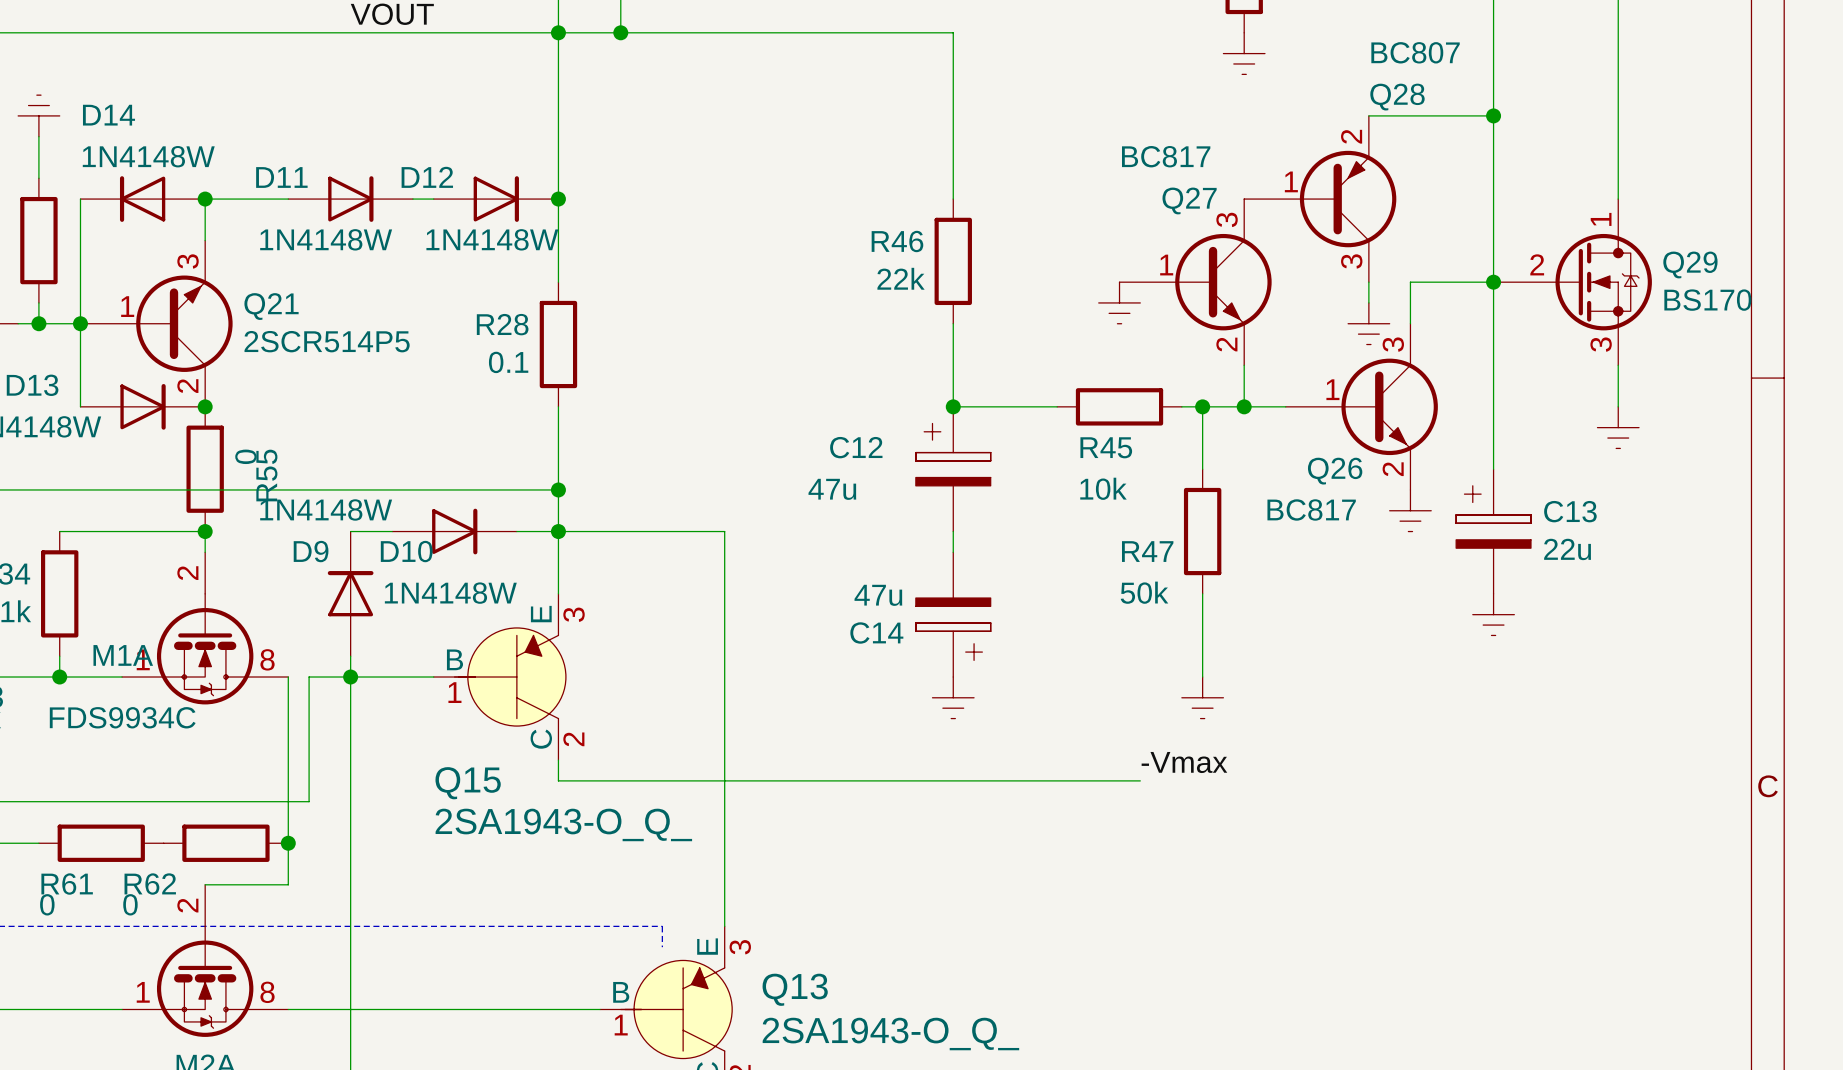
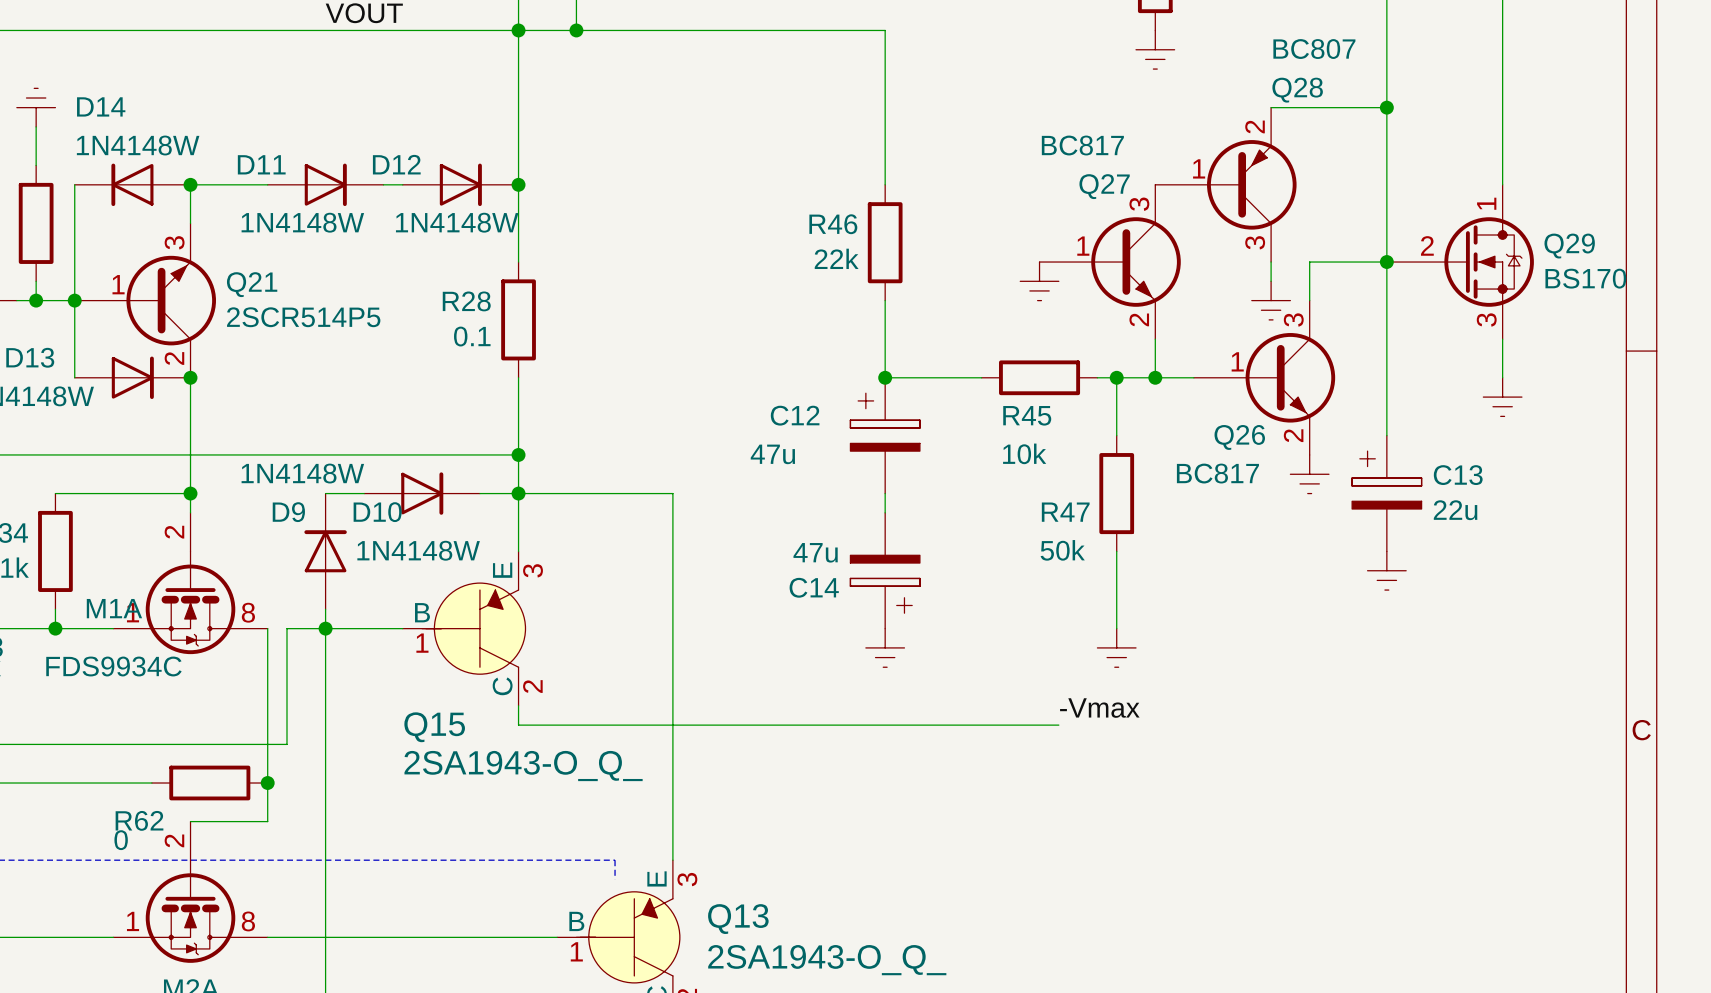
wire: none -> (190, 377) (190, 493)
R55: 0 (205, 469) -> none
wire: none -> (36, 783) (151, 783)
R61: 0 (101, 843) -> none

